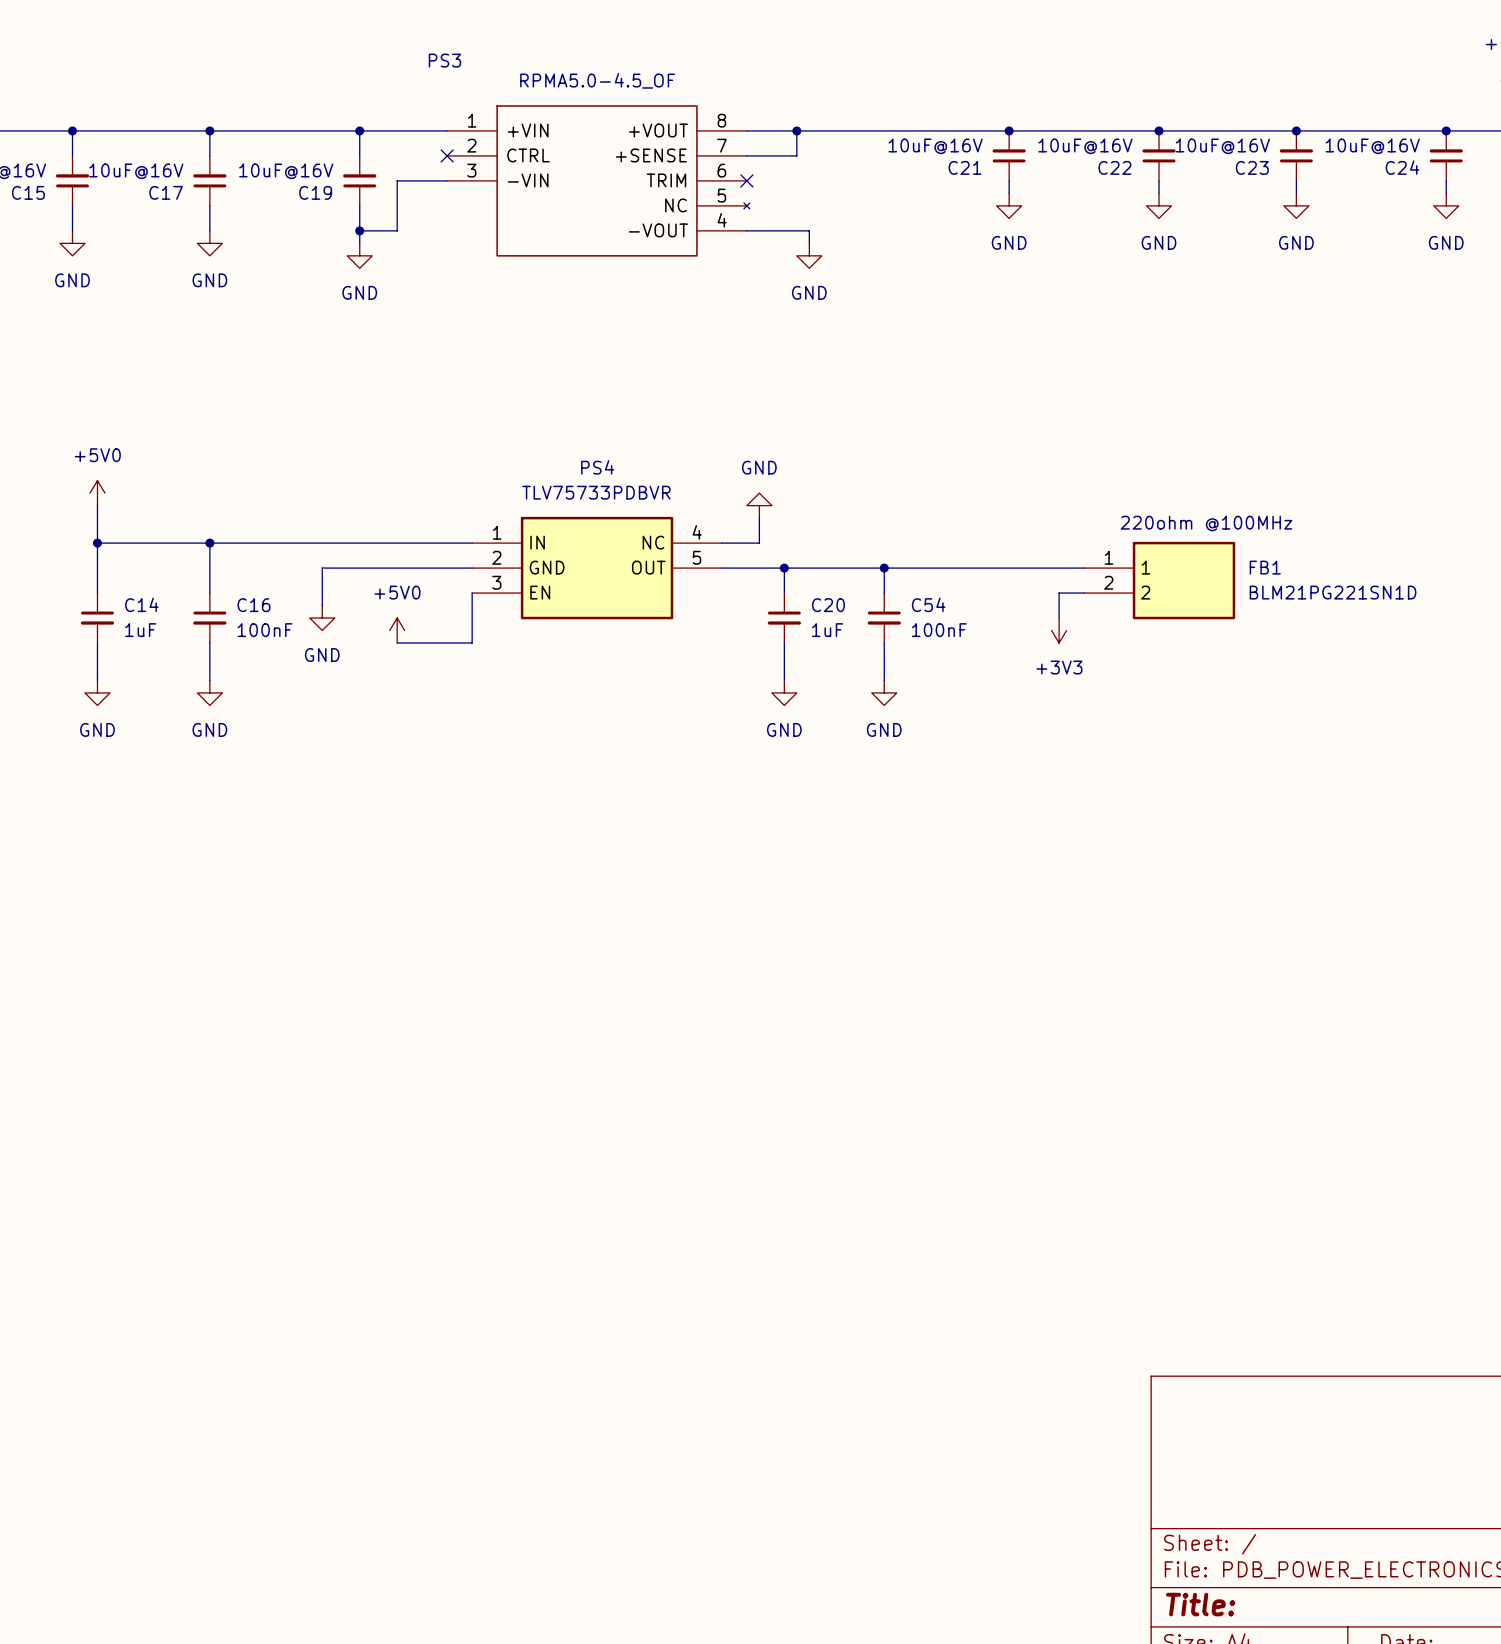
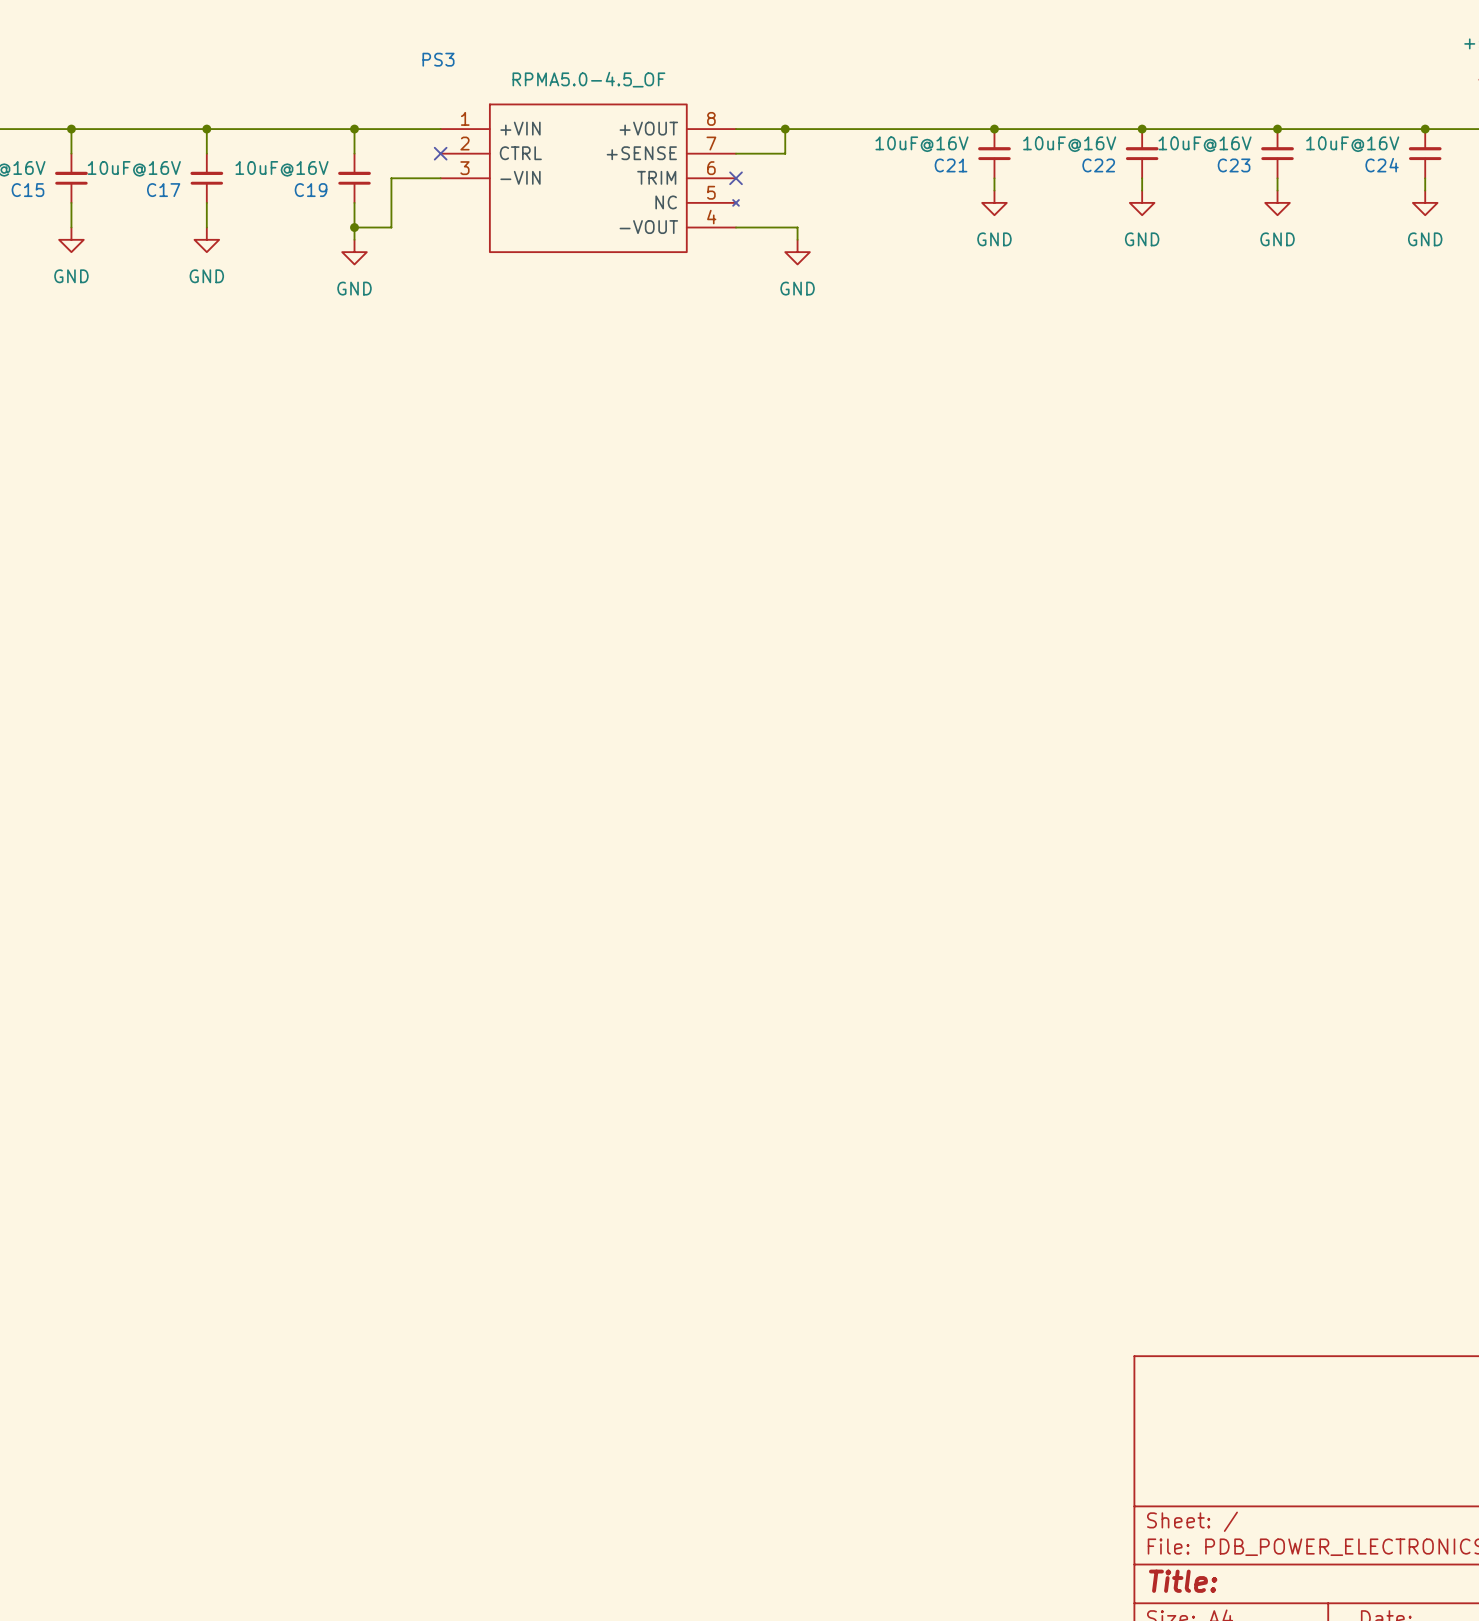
power symbol: +5V0 (97, 493) -> none
wire: (97, 505) (97, 593) -> none
power symbol: GND (759, 505) -> none
wire: (759, 518) (759, 543) (721, 543) -> none
text: 220ohm @100MHz (1206, 523) -> none
wire: (97, 543) (472, 543) -> none
junction: (97, 543) -> none
wire: (209, 543) (209, 593) -> none
junction: (209, 543) -> none
wire: (472, 568) (322, 568) (322, 605) -> none
PS4: TLV75733PDBVR (597, 568) -> none
wire: (721, 568) (1084, 568) -> none
wire: (784, 568) (784, 593) -> none
junction: (784, 568) -> none
wire: (884, 568) (884, 593) -> none
junction: (884, 568) -> none
FB1: BLM21PG221SN1D (1159, 580) -> none
wire: (472, 593) (472, 643) (397, 643) -> none
wire: (1084, 593) (1059, 593) (1059, 618) -> none
C14: 1uF (97, 618) -> none
C16: 100nF (209, 618) -> none
power symbol: GND (322, 618) -> none
C20: 1uF (784, 618) -> none
C54: 100nF (884, 618) -> none
power symbol: +5V0 (397, 630) -> none
power symbol: +3V3 (1059, 630) -> none
wire: (97, 643) (97, 680) -> none
wire: (209, 643) (209, 680) -> none
wire: (784, 643) (784, 680) -> none
wire: (884, 643) (884, 680) -> none
power symbol: GND (97, 692) -> none
power symbol: GND (209, 692) -> none
power symbol: GND (784, 692) -> none
power symbol: GND (884, 692) -> none

